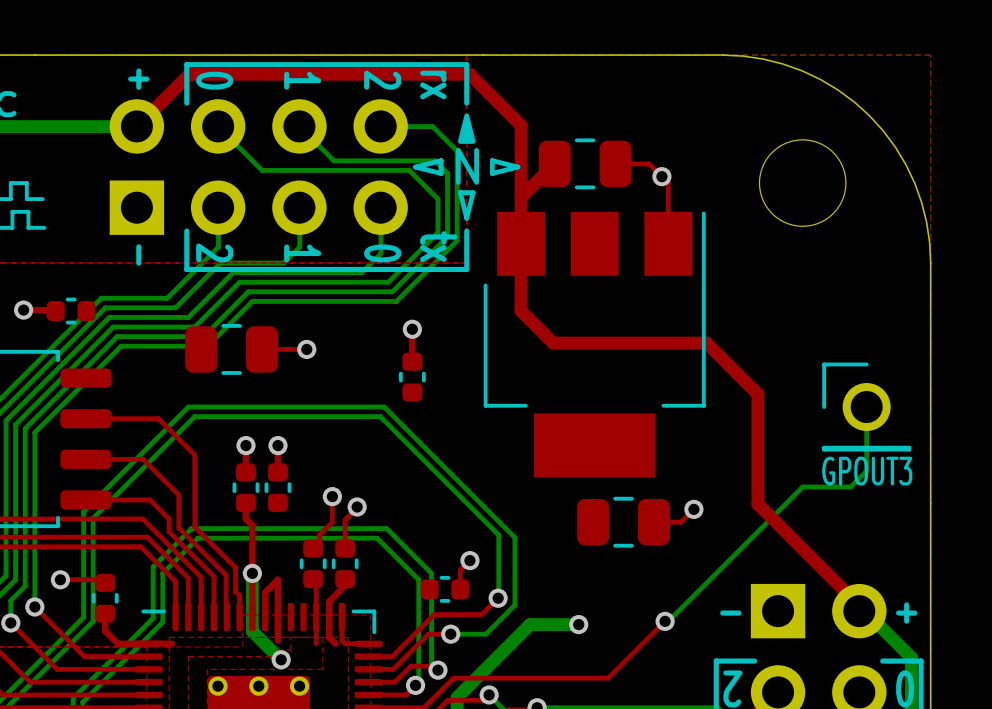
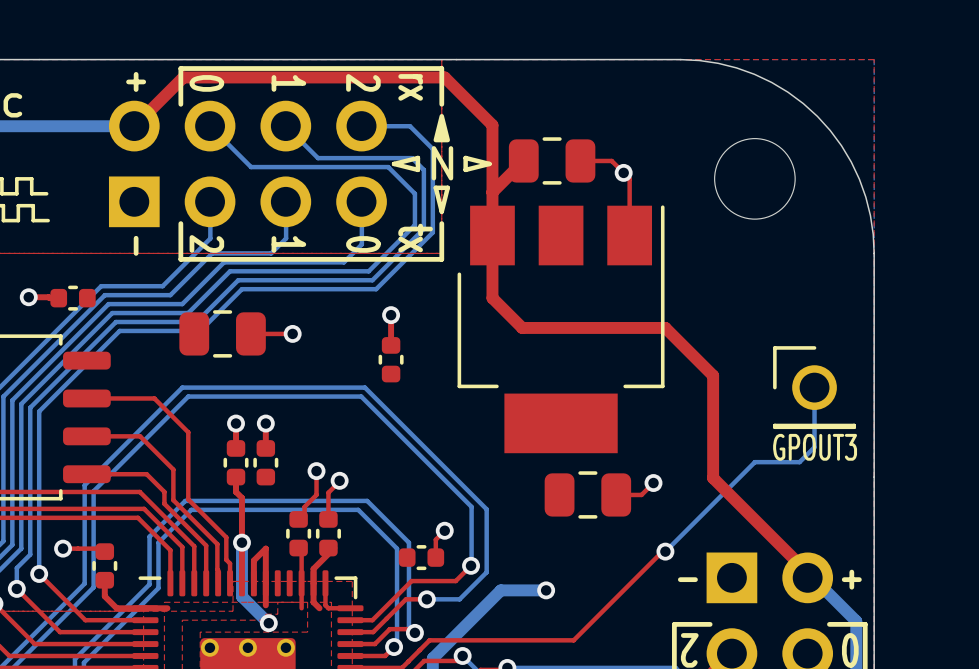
top track: none -> (665, 551) (662, 551) (626, 587)
bottom track: (706, 582) (669, 619) (665, 621) -> none
via position: (665, 621) -> (665, 551)

